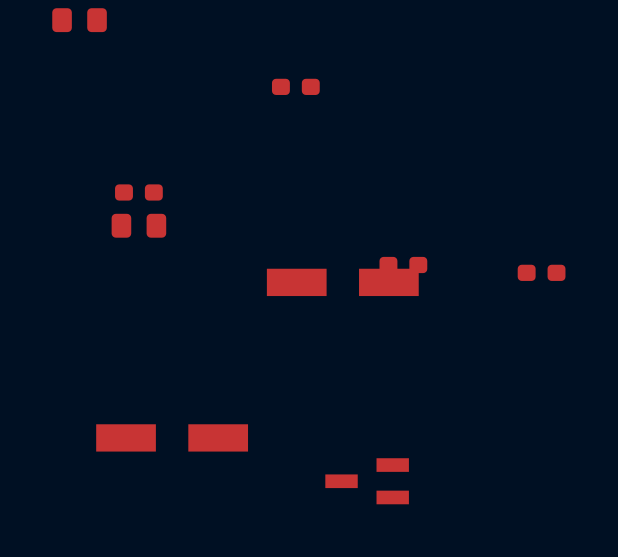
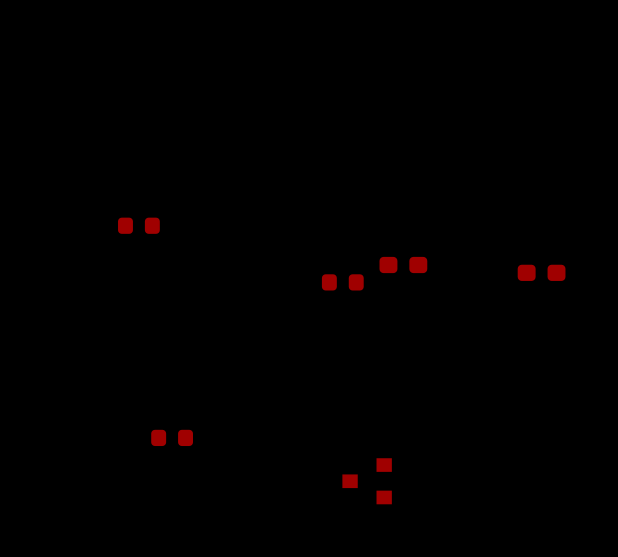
part: (79, 20) -> none
part: (295, 86) -> none
part: (138, 192) -> none
part footprint: [111, 213, 167, 238] -> [118, 217, 160, 234]
part footprint: [266, 268, 419, 297] -> [321, 274, 364, 291]
part footprint: [96, 424, 249, 452] -> [151, 429, 194, 447]
part footprint: [325, 458, 409, 505] -> [342, 458, 392, 505]

